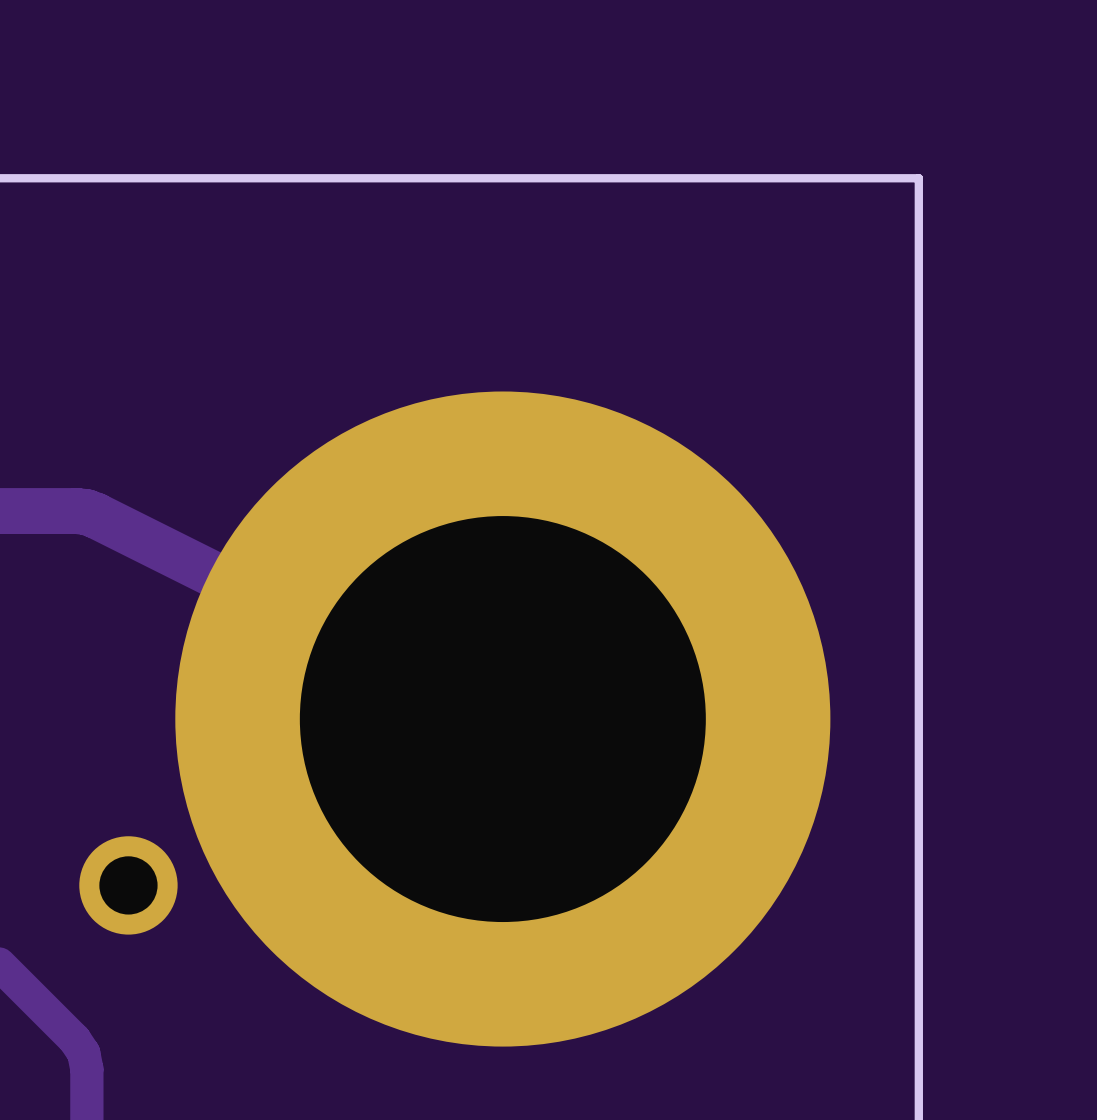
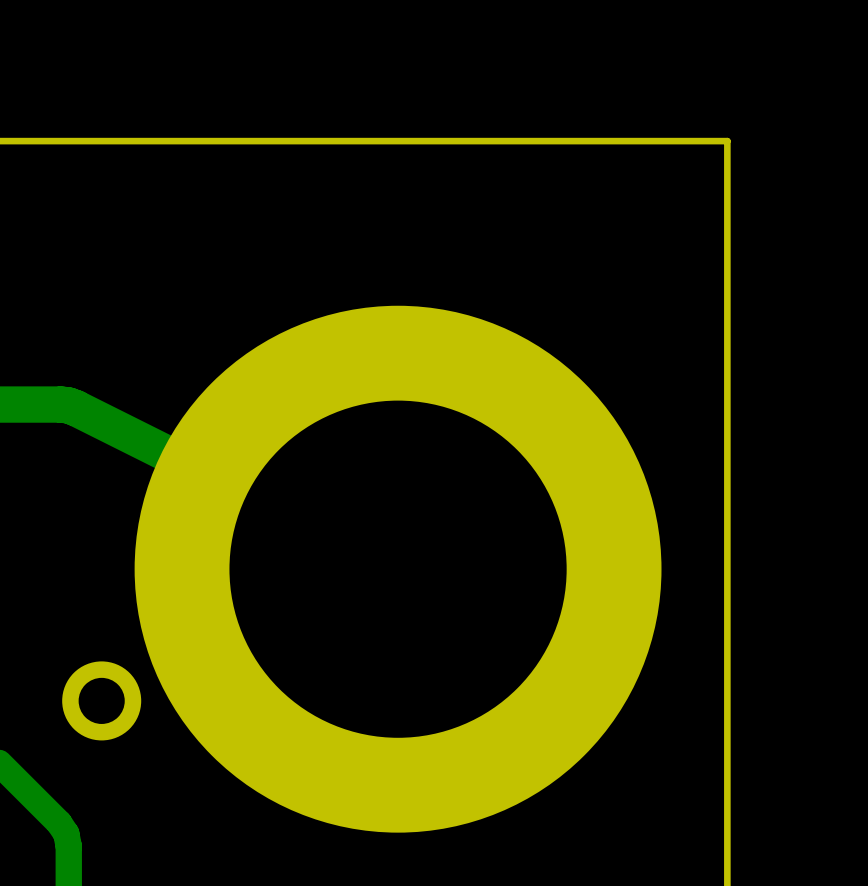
part: none -> (361, 569)
via: (502, 719) -> none
via: (128, 885) -> none

